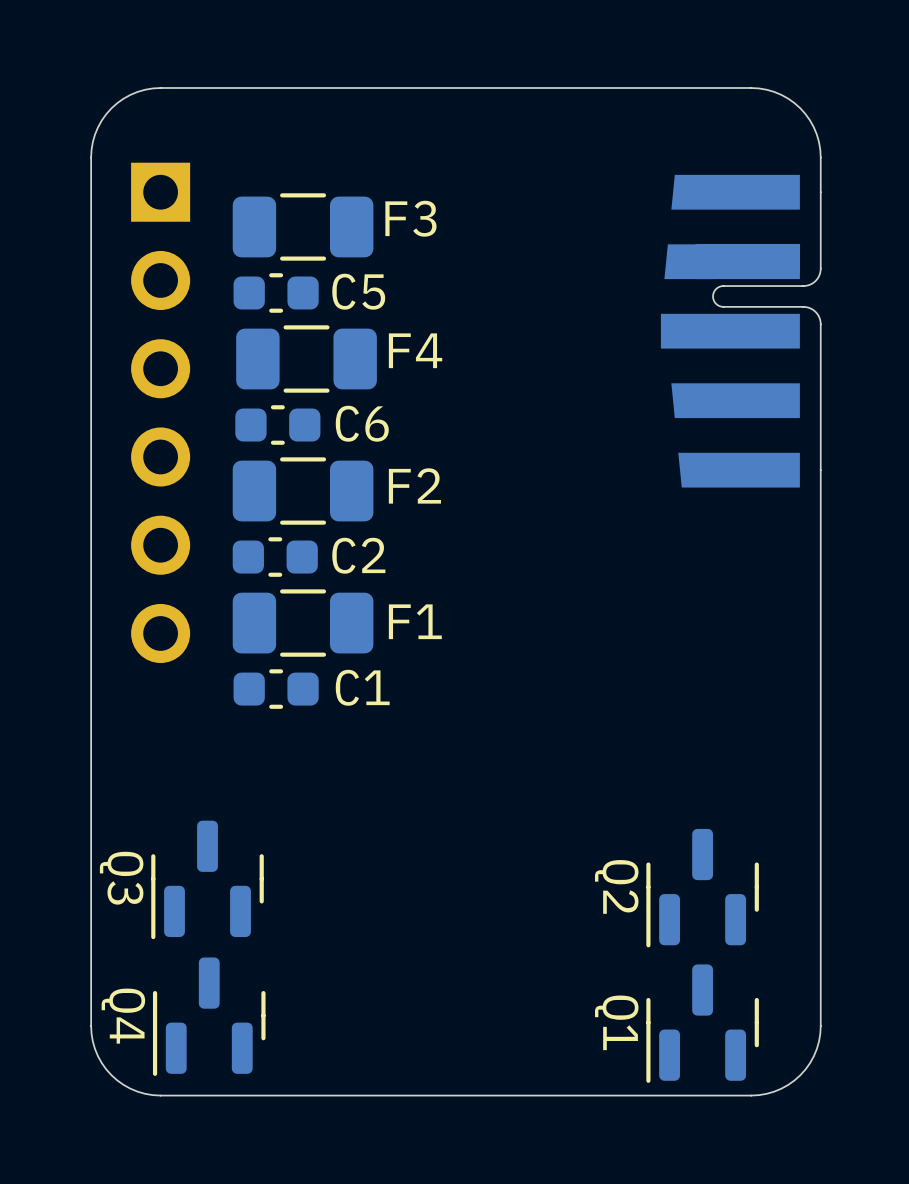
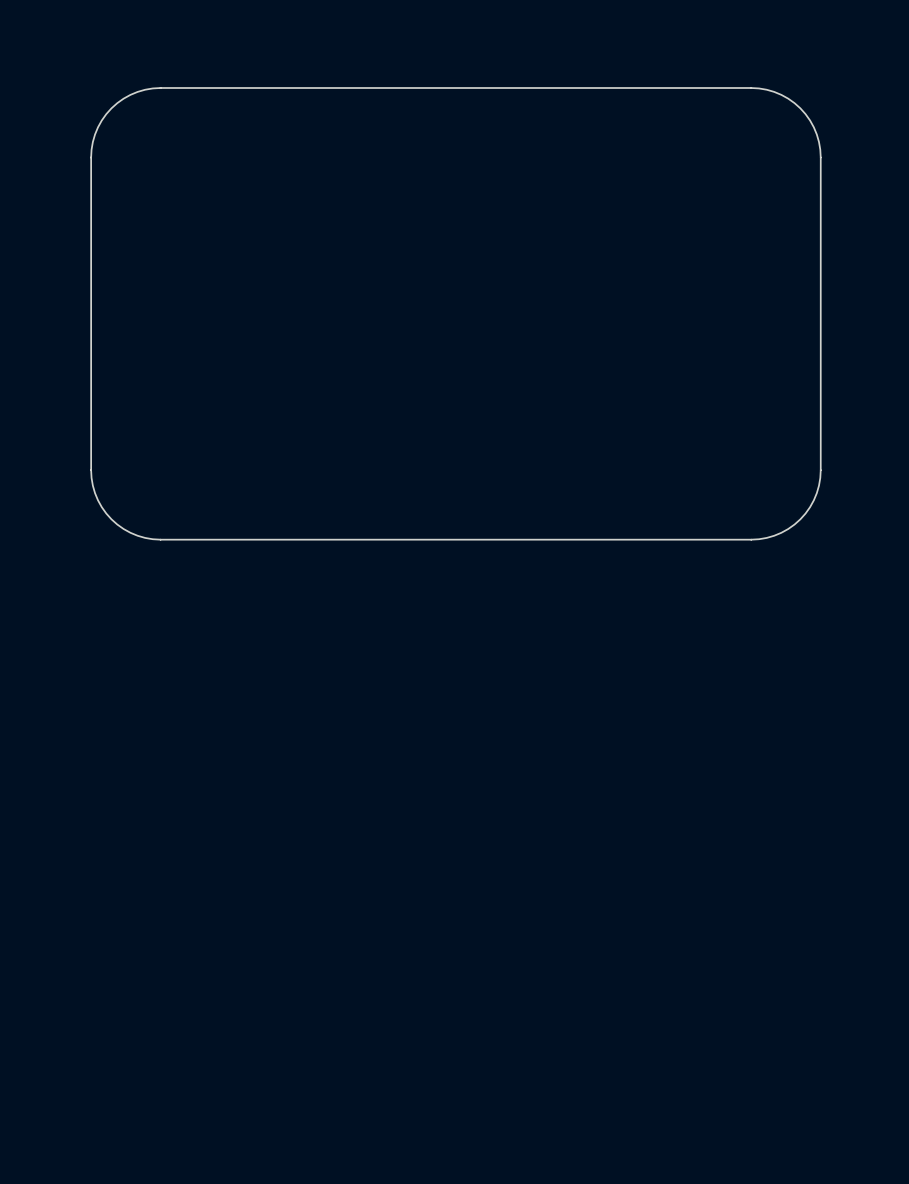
F3: (303, 226) -> none
C5: (276, 292) -> none
part: (741, 331) -> none
F4: (306, 359) -> none
part: (160, 412) -> none
C6: (277, 425) -> none
board edge: (820, 470) (820, 1033) (816, 1049) (810, 1063) (794, 1080) (774, 1091) (751, 1095) (160, 1095) (145, 1093) (130, 1088) (111, 1075) (98, 1056) (92, 1041) (91, 1026) (91, 470) -> (820, 192) (820, 477) (813, 500) (805, 513) (788, 529) (774, 535) (751, 539) (152, 539) (130, 532) (117, 524) (106, 513) (95, 493) (91, 470)
F2: (303, 491) -> none
C2: (275, 557) -> none
F1: (303, 623) -> none
C1: (276, 689) -> none
Q3: (207, 879) -> none
Q2: (702, 888) -> none
Q4: (209, 1016) -> none
Q1: (702, 1023) -> none

